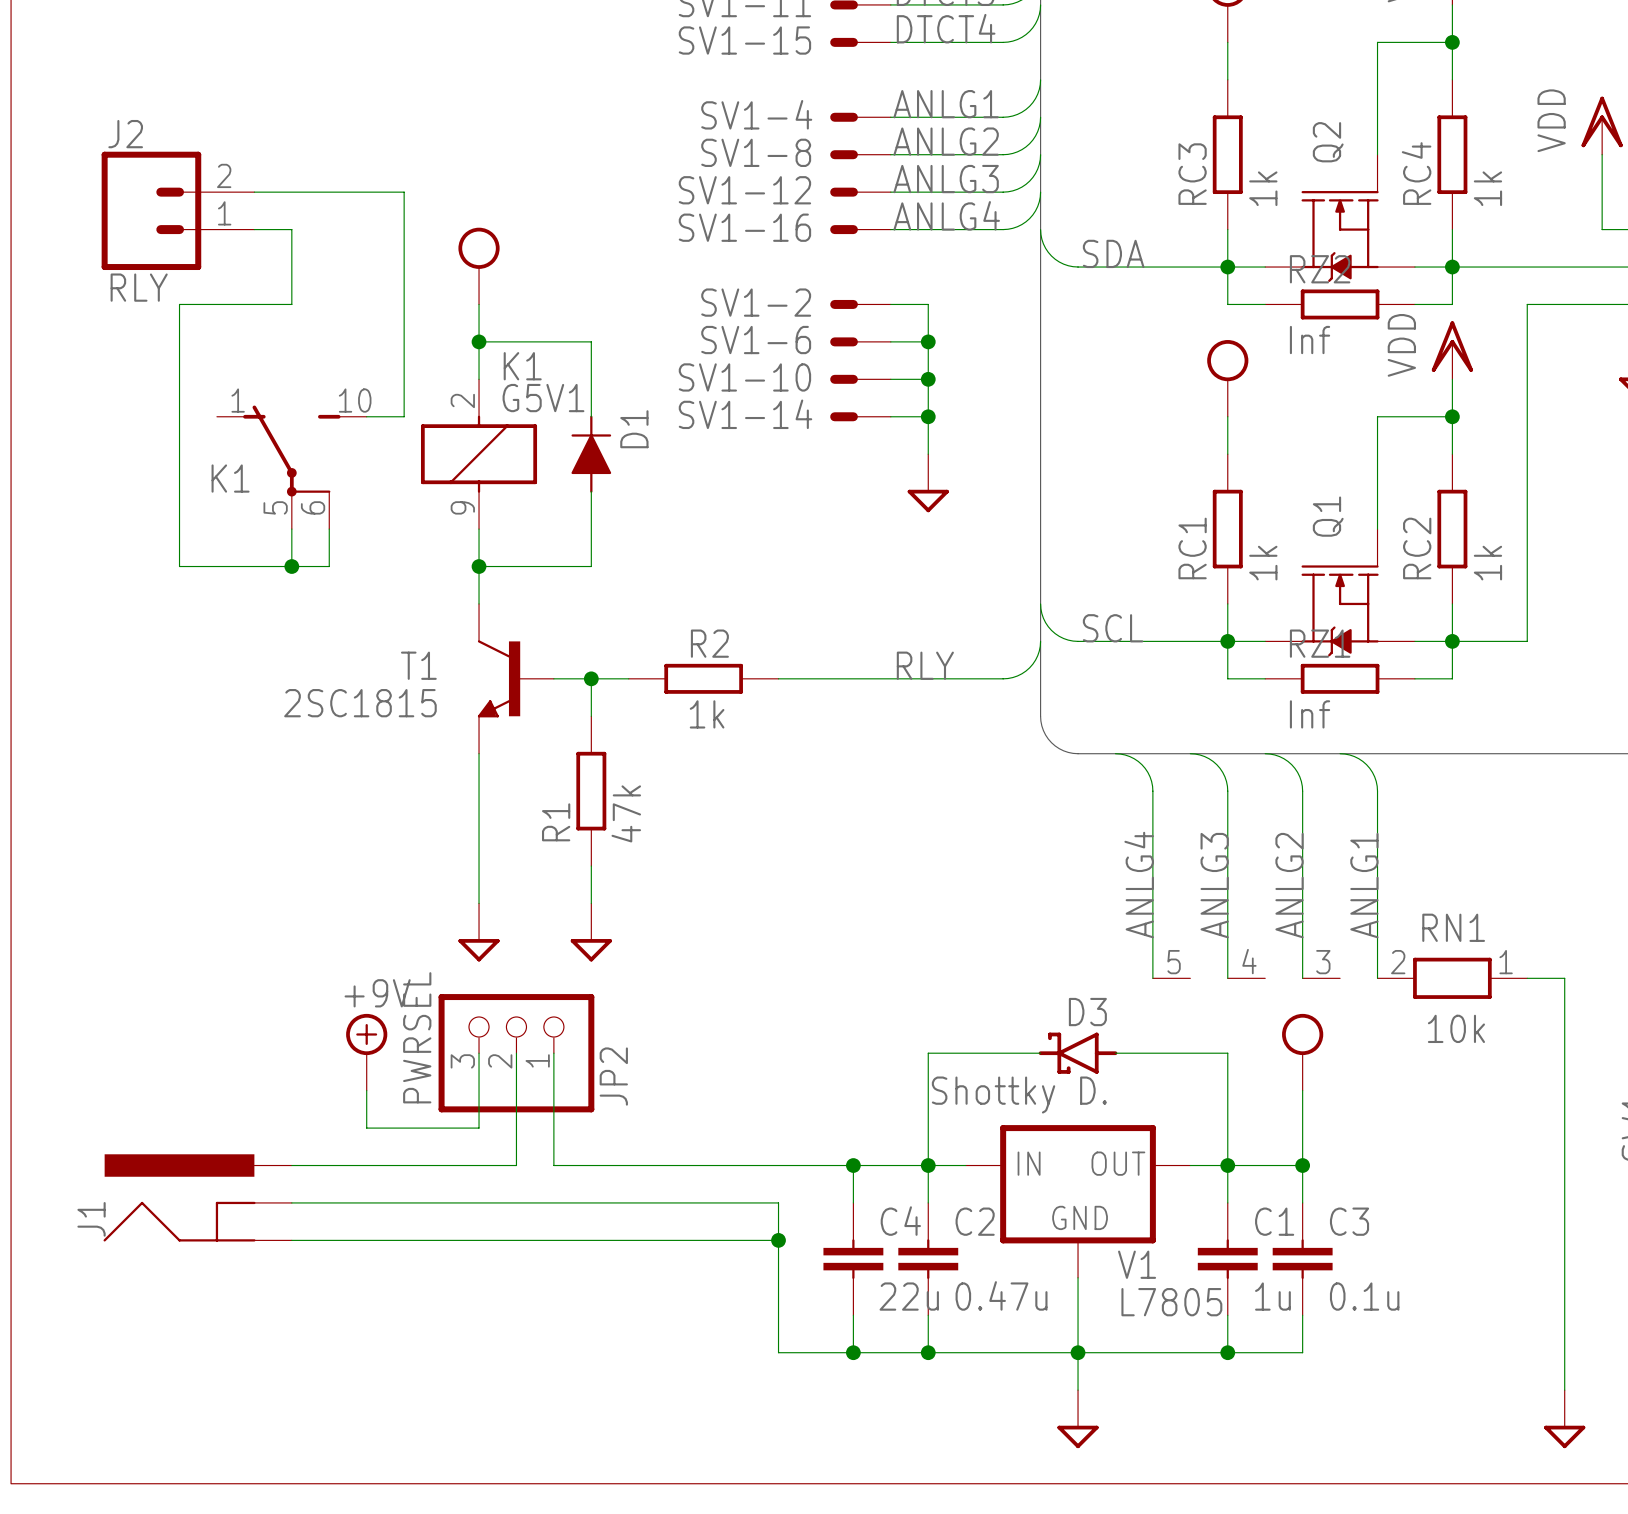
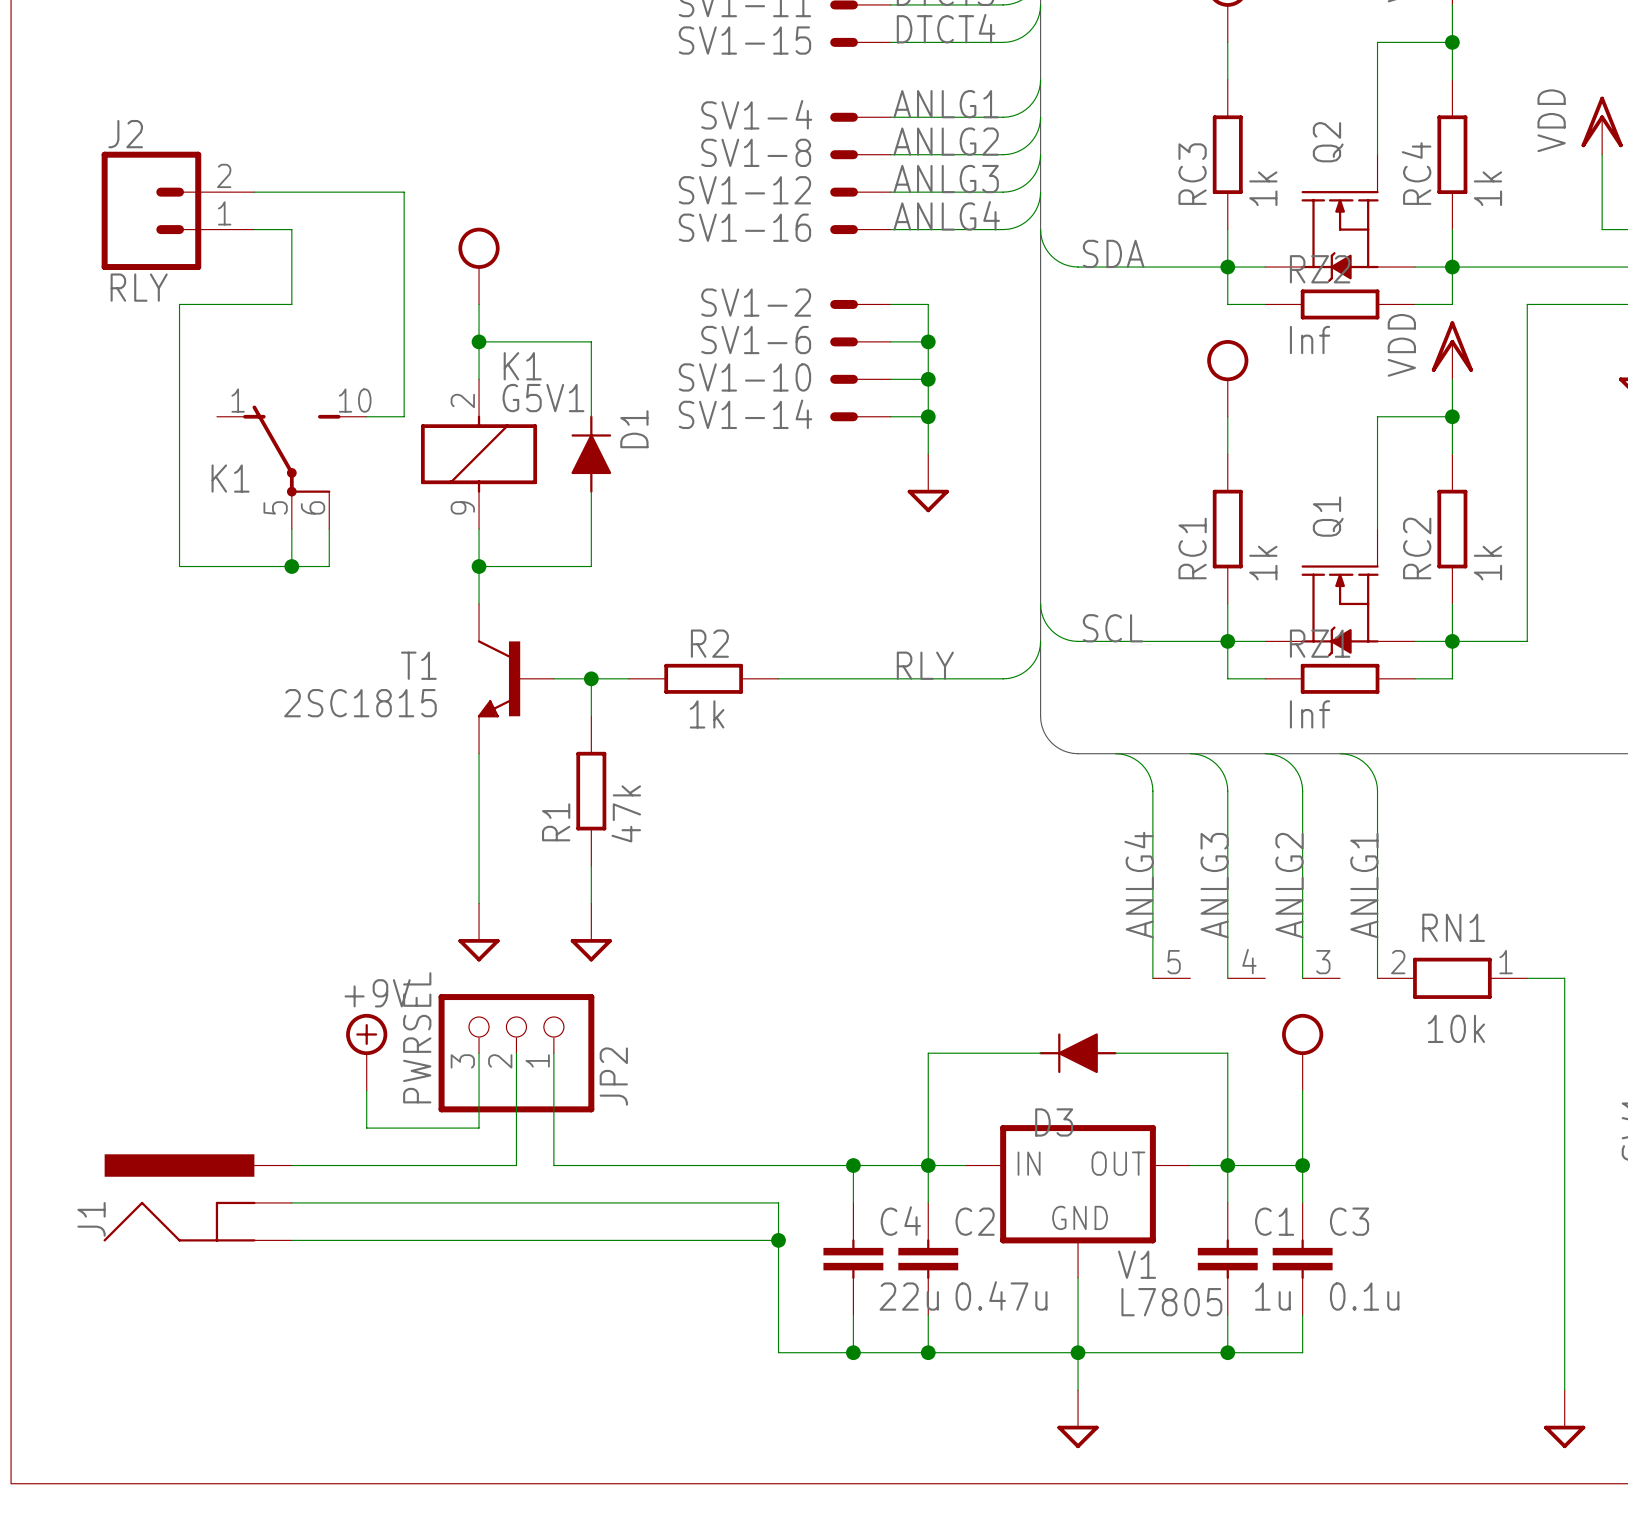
D3 name position: D3 (1087, 1012) -> D3 (1054, 1122)
D3 symbol: [1038, 1032, 1118, 1074] -> [1039, 1033, 1117, 1074]
D3 value: Shottky D. (1019, 1095) -> none

